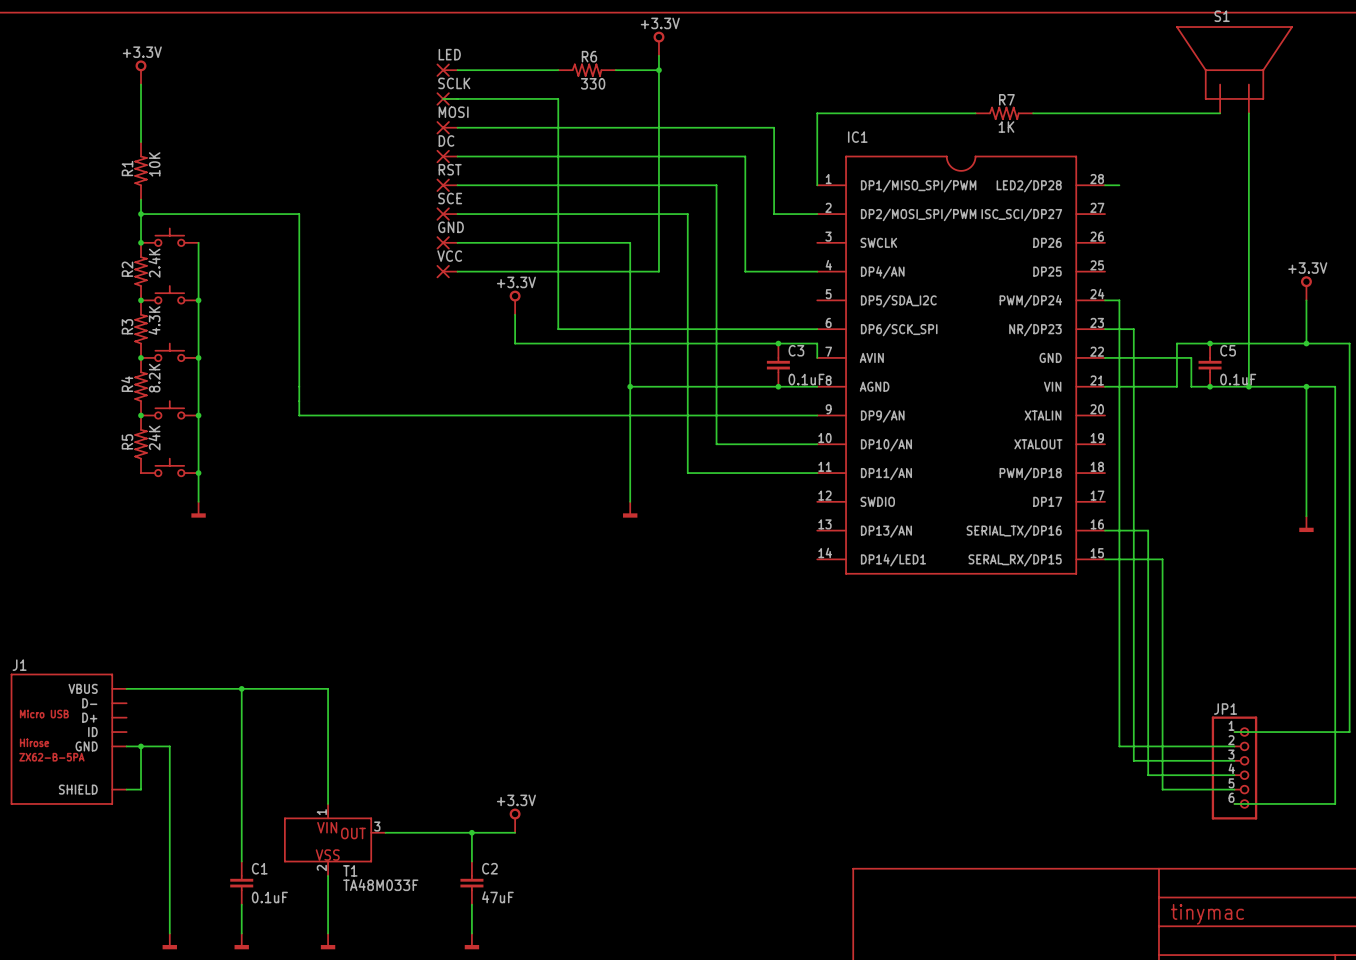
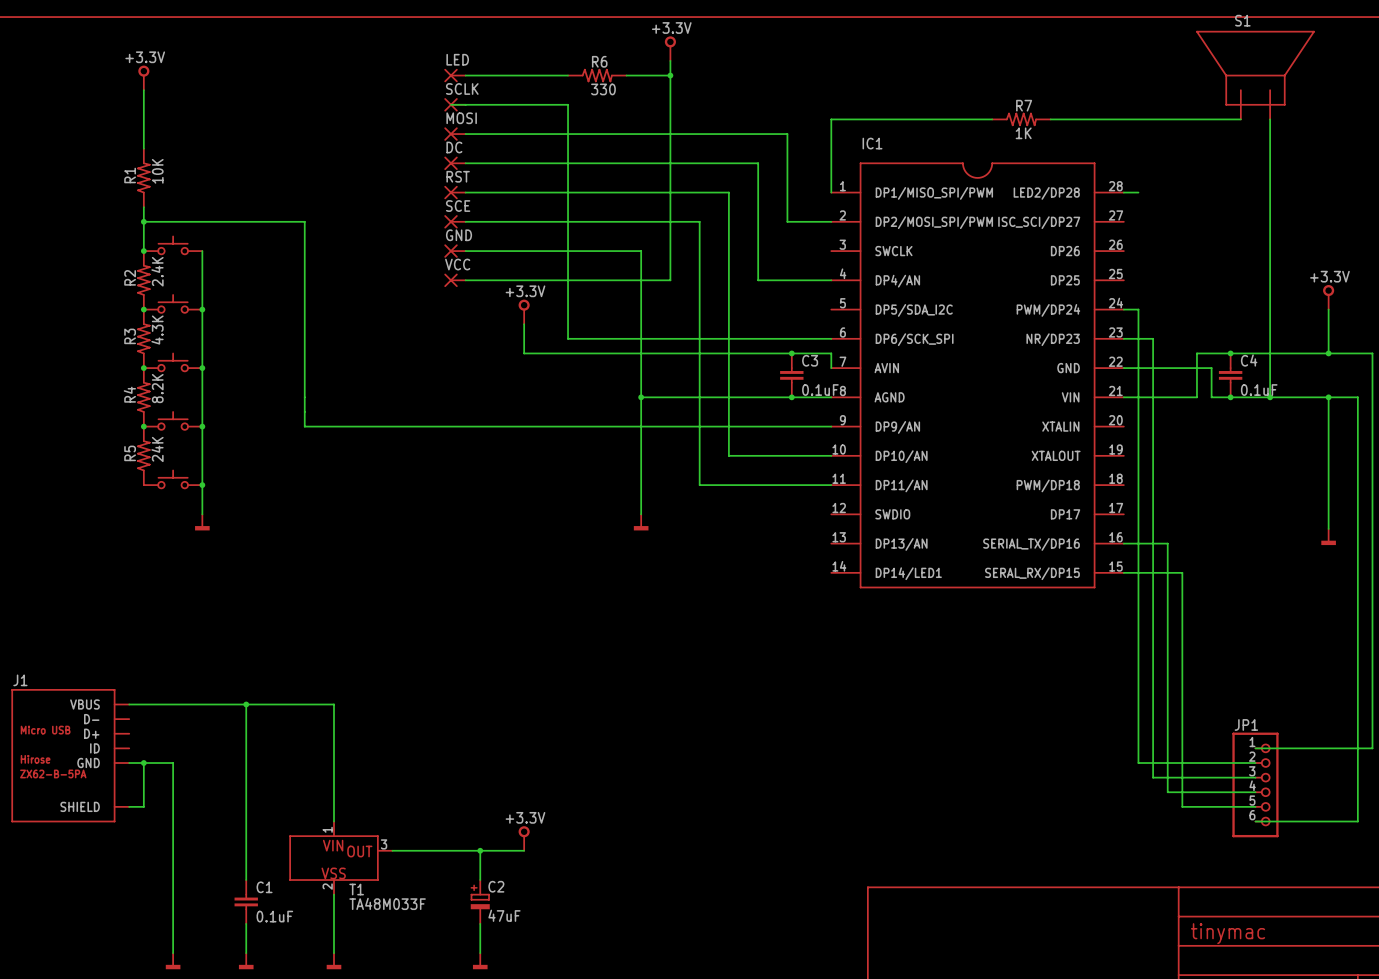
C5 name: C5 (1228, 350) -> C4 (1249, 360)
C2 symbol: [460, 861, 484, 905] -> [470, 880, 490, 924]

